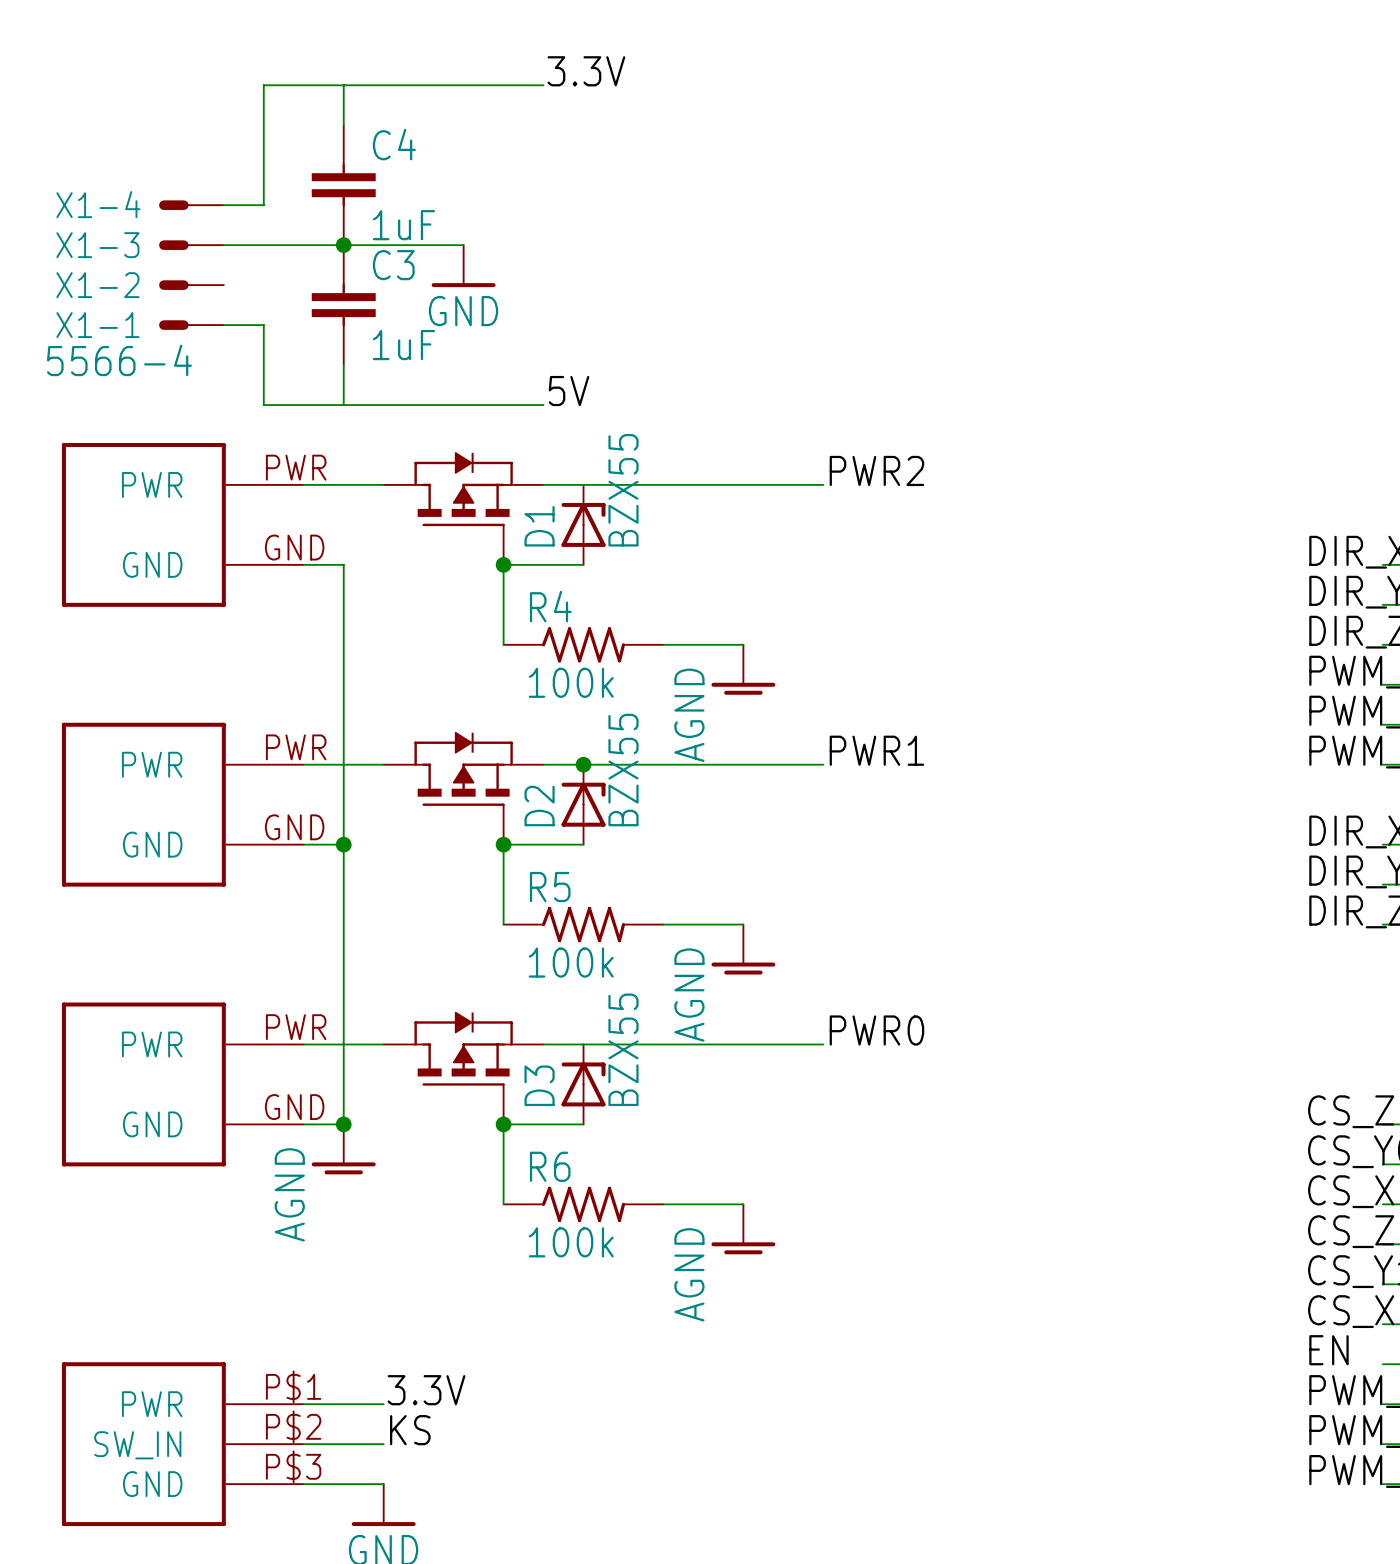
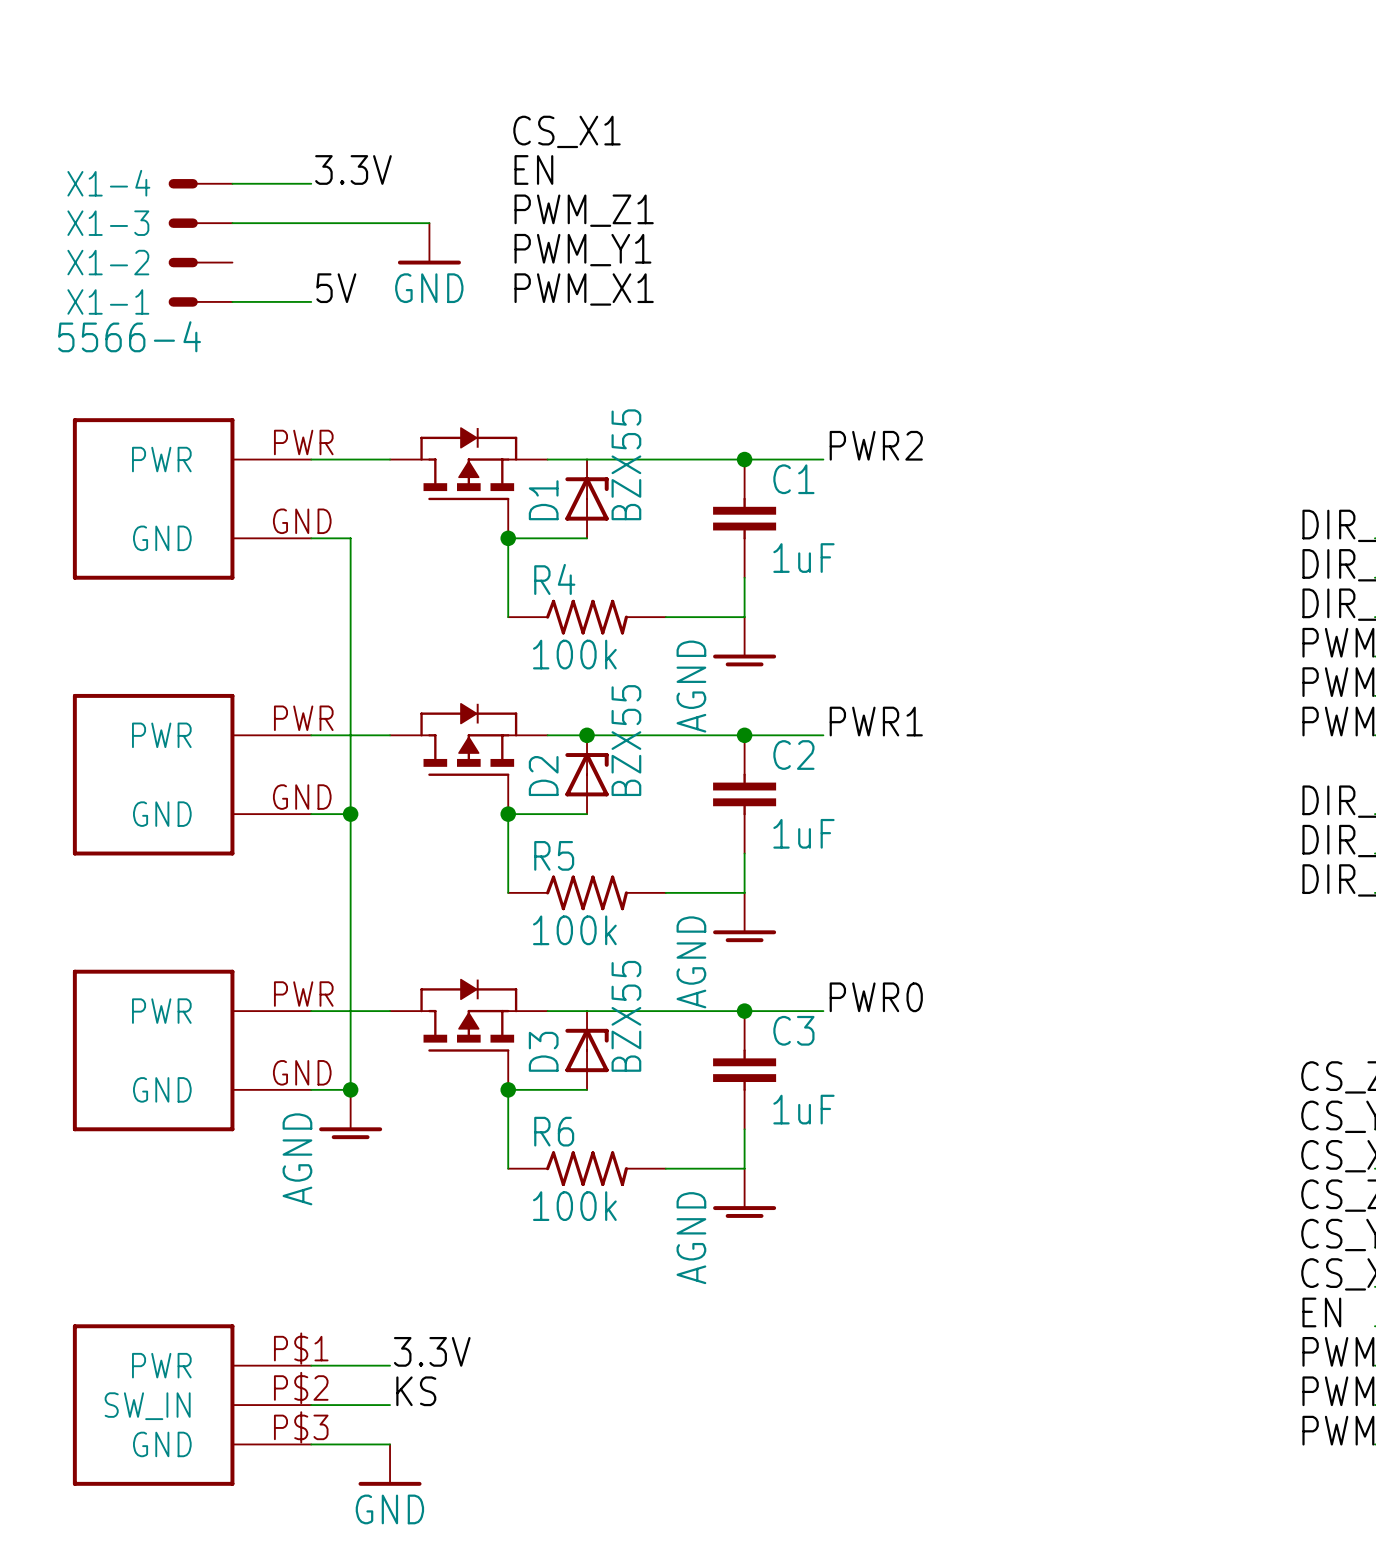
label position: 3.3V (586, 71) -> 3.3V (353, 169)
wire: (343, 85) (343, 125) -> none
wire: (543, 85) (263, 85) (263, 205) -> (311, 183) (271, 183)
label: none -> CS_X1 (566, 131)
C4: 1uF (343, 185) -> none
label: none -> EN (533, 169)
label: none -> PWM_Z1 (584, 210)
junction: (343, 245) -> none
wire: (423, 245) (463, 245) -> none
power symbol position: GND (463, 266) -> GND (429, 243)
label: none -> PWM_Y1 (582, 250)
C3 position: (343, 305) -> (744, 1070)
label: none -> PWM_X1 (584, 289)
wire: (263, 325) (263, 405) (543, 405) -> (271, 301) (311, 301)
wire: (343, 365) (343, 405) -> none
label position: 5V (569, 391) -> 5V (336, 288)
junction: none -> (744, 459)
C1: none -> 1uF (744, 518)
wire: none -> (744, 577) (744, 617)
junction: none -> (744, 735)
C2: none -> 1uF (744, 794)
wire: none -> (744, 853) (744, 892)
junction: none -> (744, 1011)
wire: none -> (744, 1129) (744, 1168)

